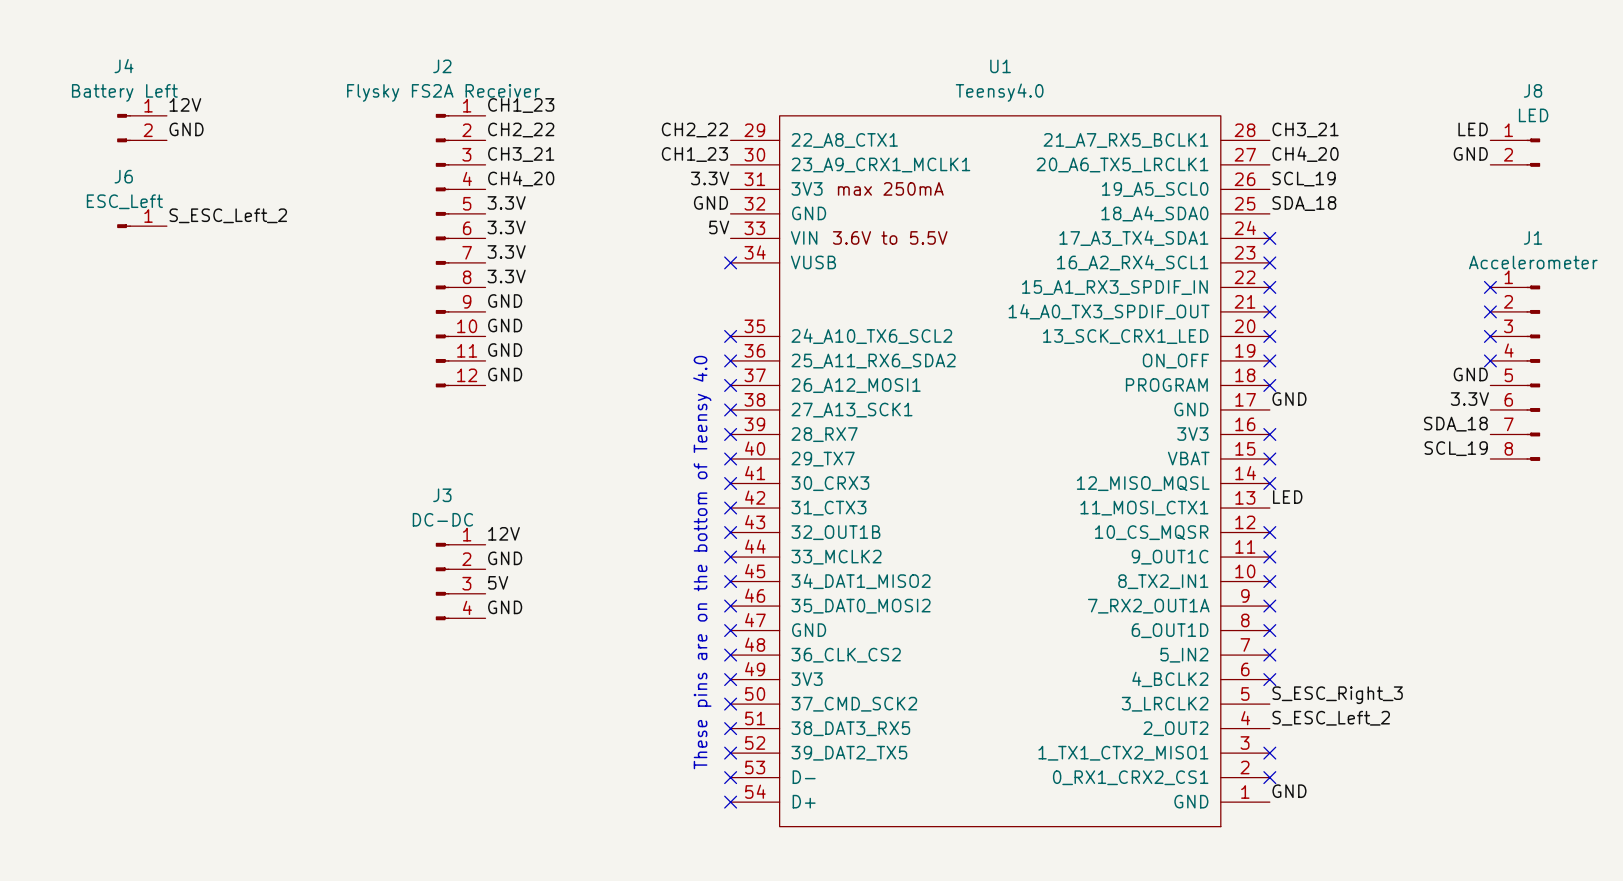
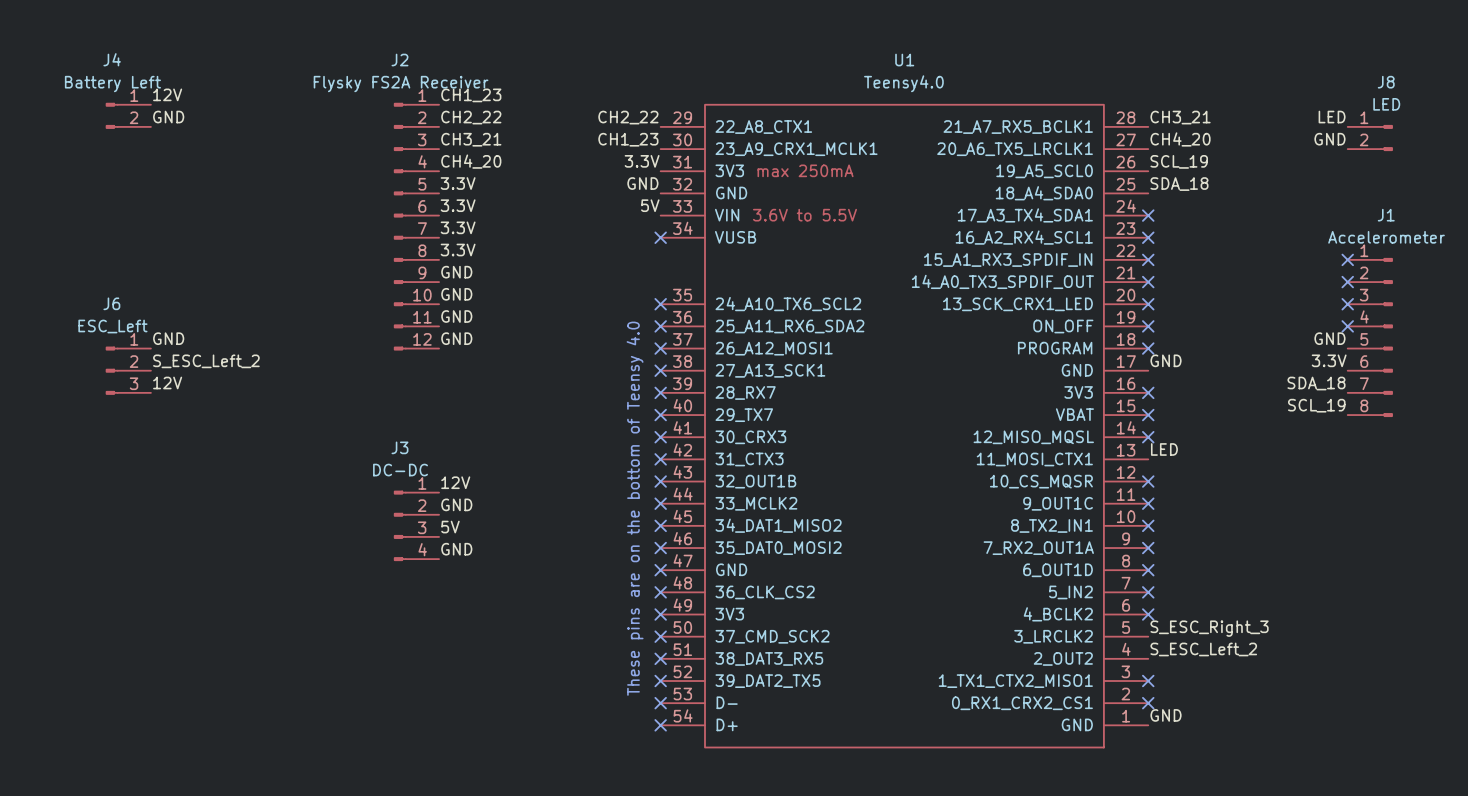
J6 name position: J6 (123, 176) -> J6 (111, 303)
J6 value position: ESC_Left (124, 201) -> ESC_Left (112, 326)
label position: S_ESC_Left_2 (228, 215) -> S_ESC_Left_2 (206, 361)
J6 symbol: [117, 224, 167, 229] -> [105, 346, 151, 395]
label: none -> GND (168, 338)
label: none -> 12V (167, 382)

